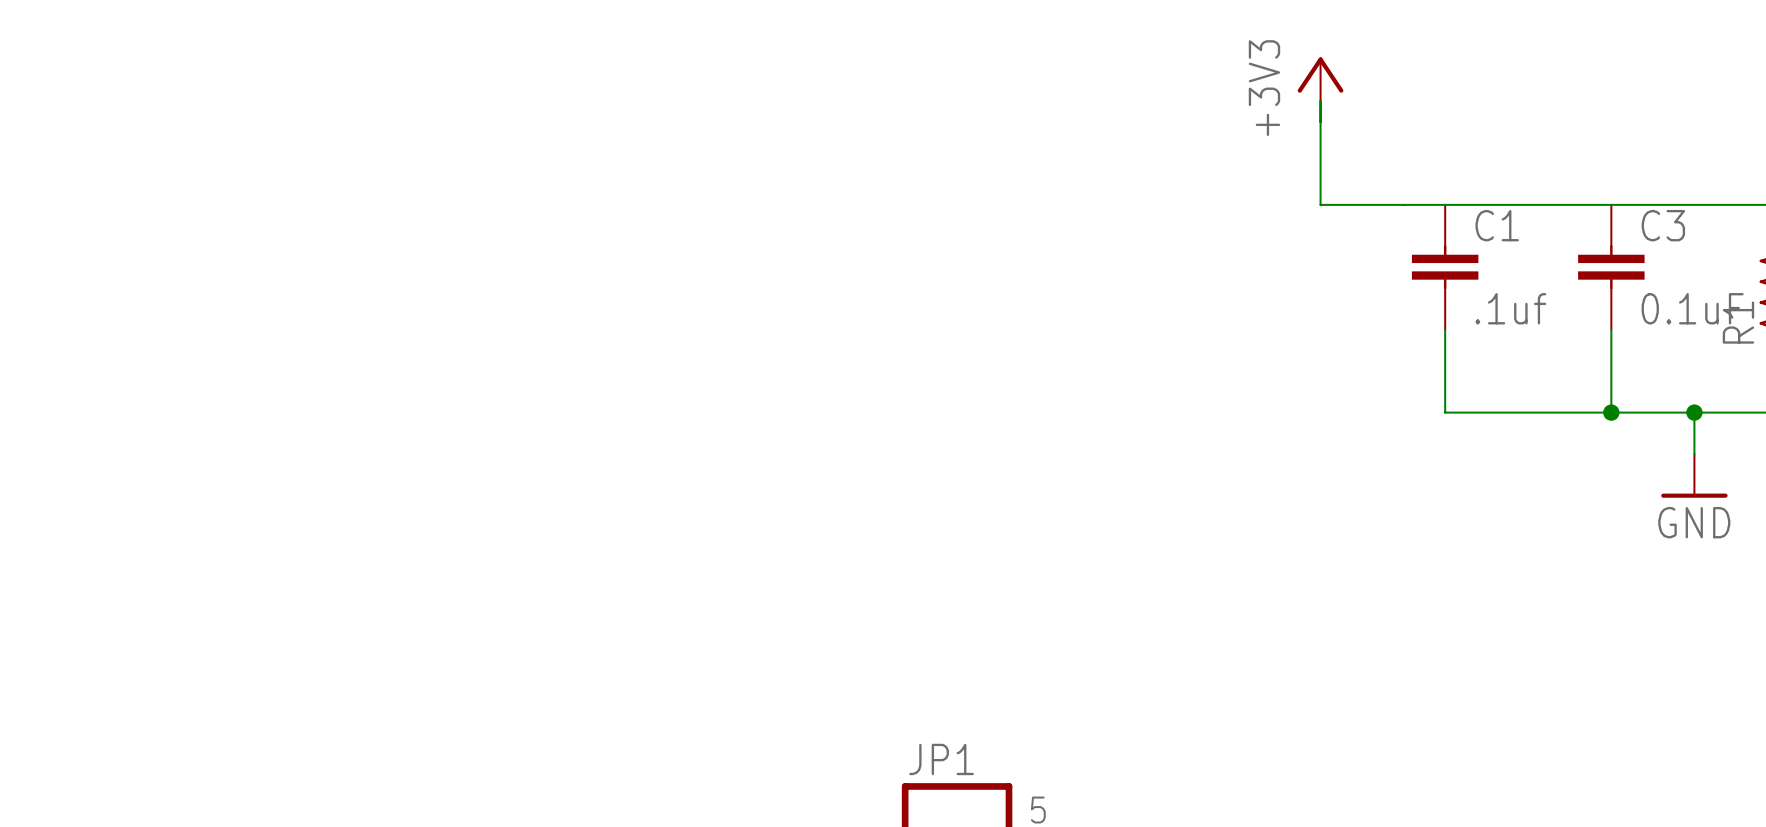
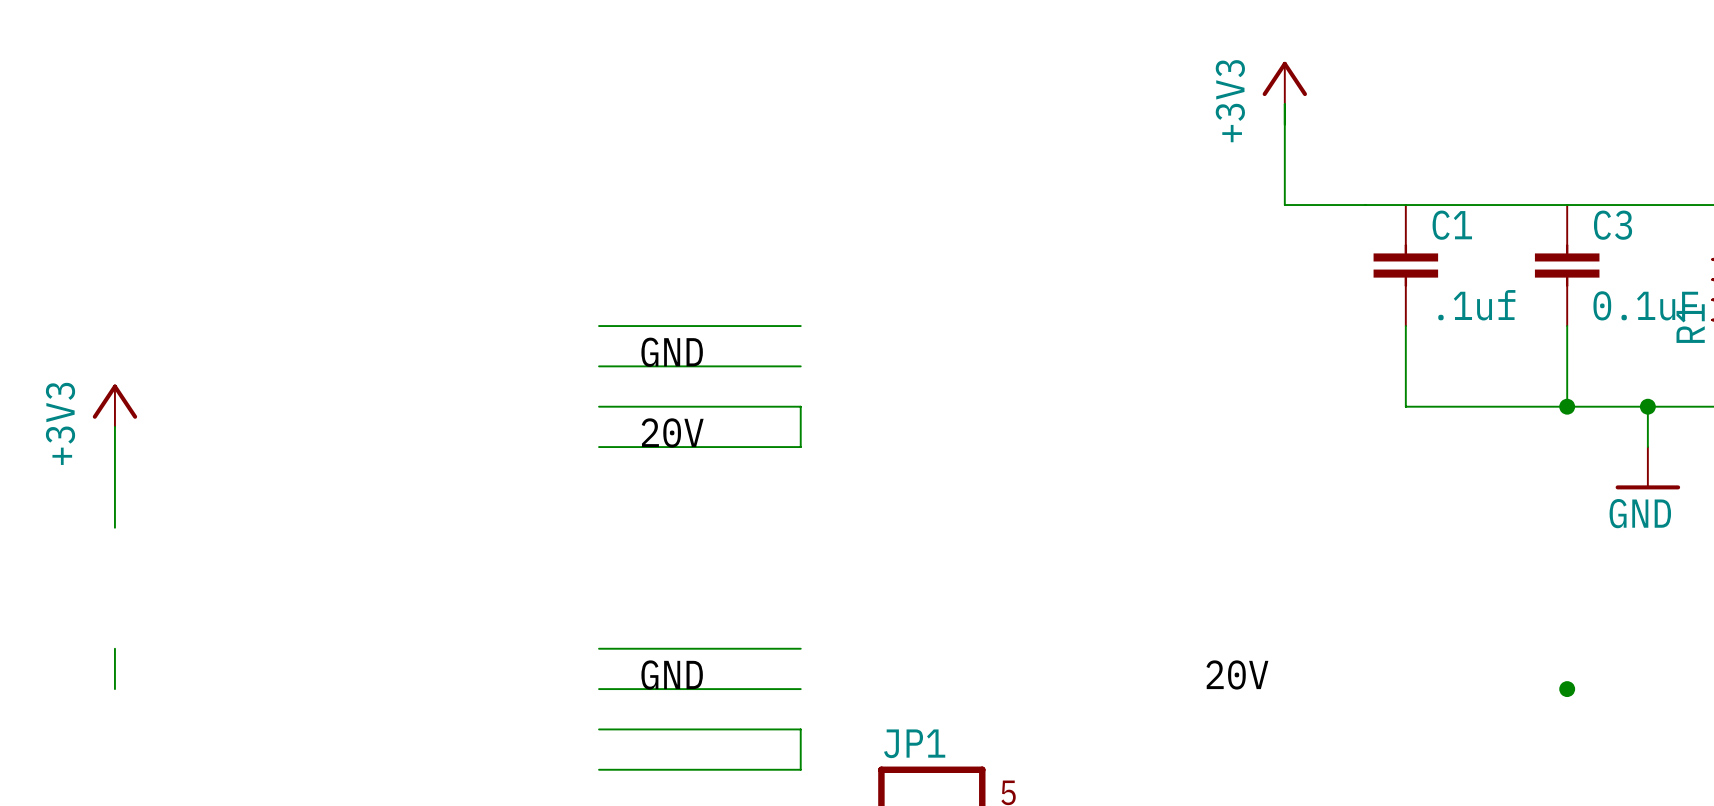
wire: none -> (599, 326) (800, 326)
label: none -> GND (672, 352)
wire: none -> (599, 366) (800, 366)
power symbol: none -> +3V3 (114, 405)
wire: none -> (599, 406) (800, 406) (800, 447) (599, 447)
wire: none -> (114, 426) (114, 527)
label: none -> 20V (672, 432)
wire: none -> (114, 648) (114, 689)
wire: none -> (599, 648) (800, 648)
label: none -> GND (672, 674)
label: none -> 20V (1237, 674)
wire: none -> (599, 689) (800, 689)
junction: none -> (1567, 689)
wire: none -> (599, 729) (800, 729) (800, 769) (599, 769)

